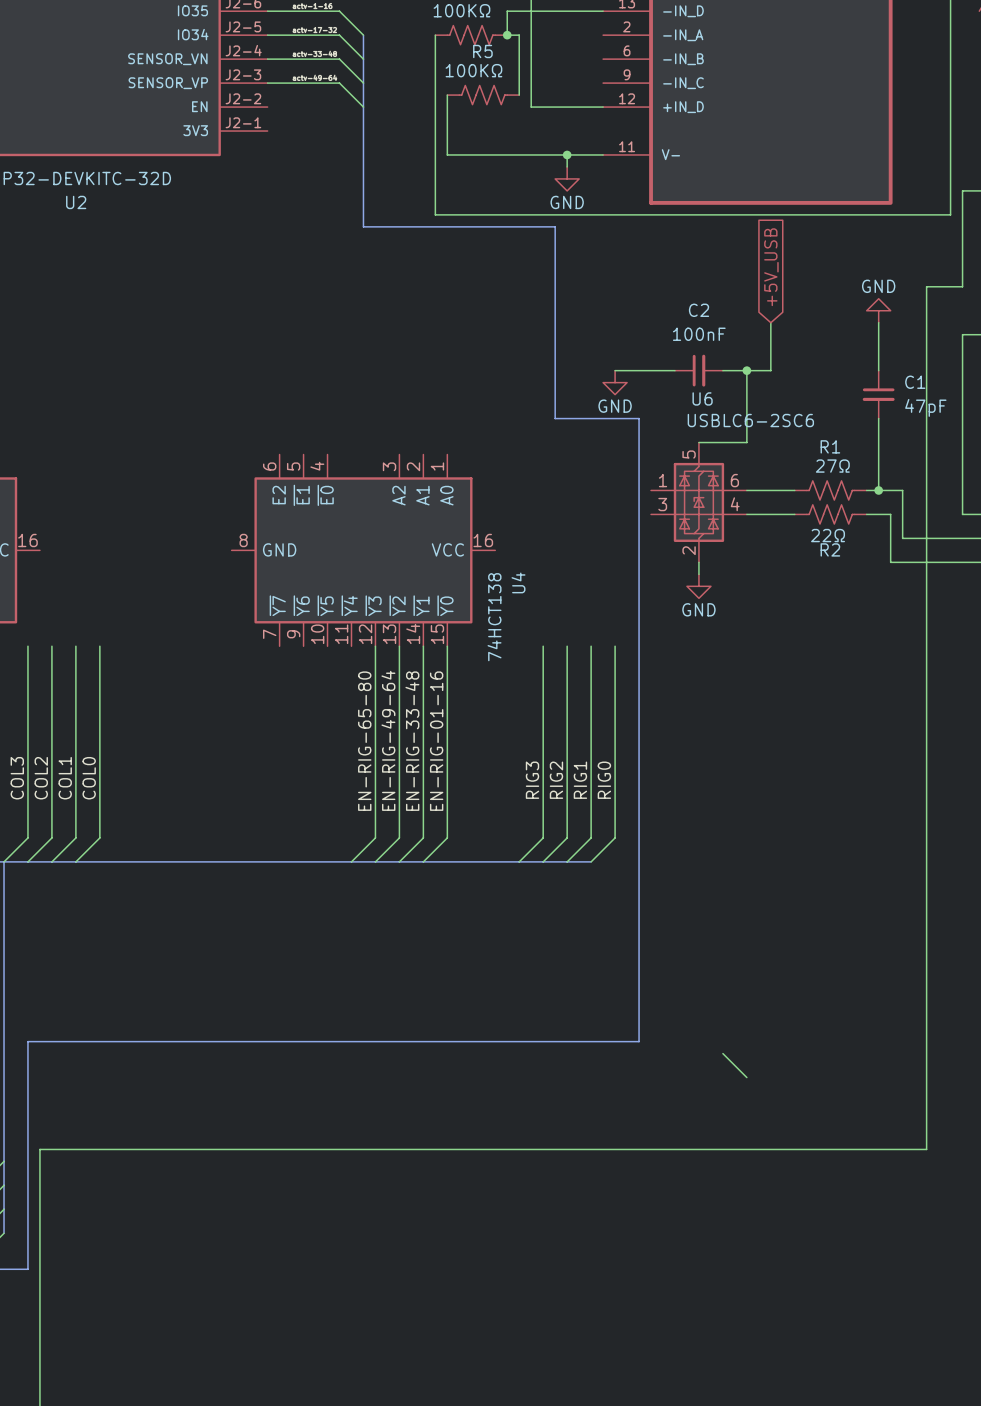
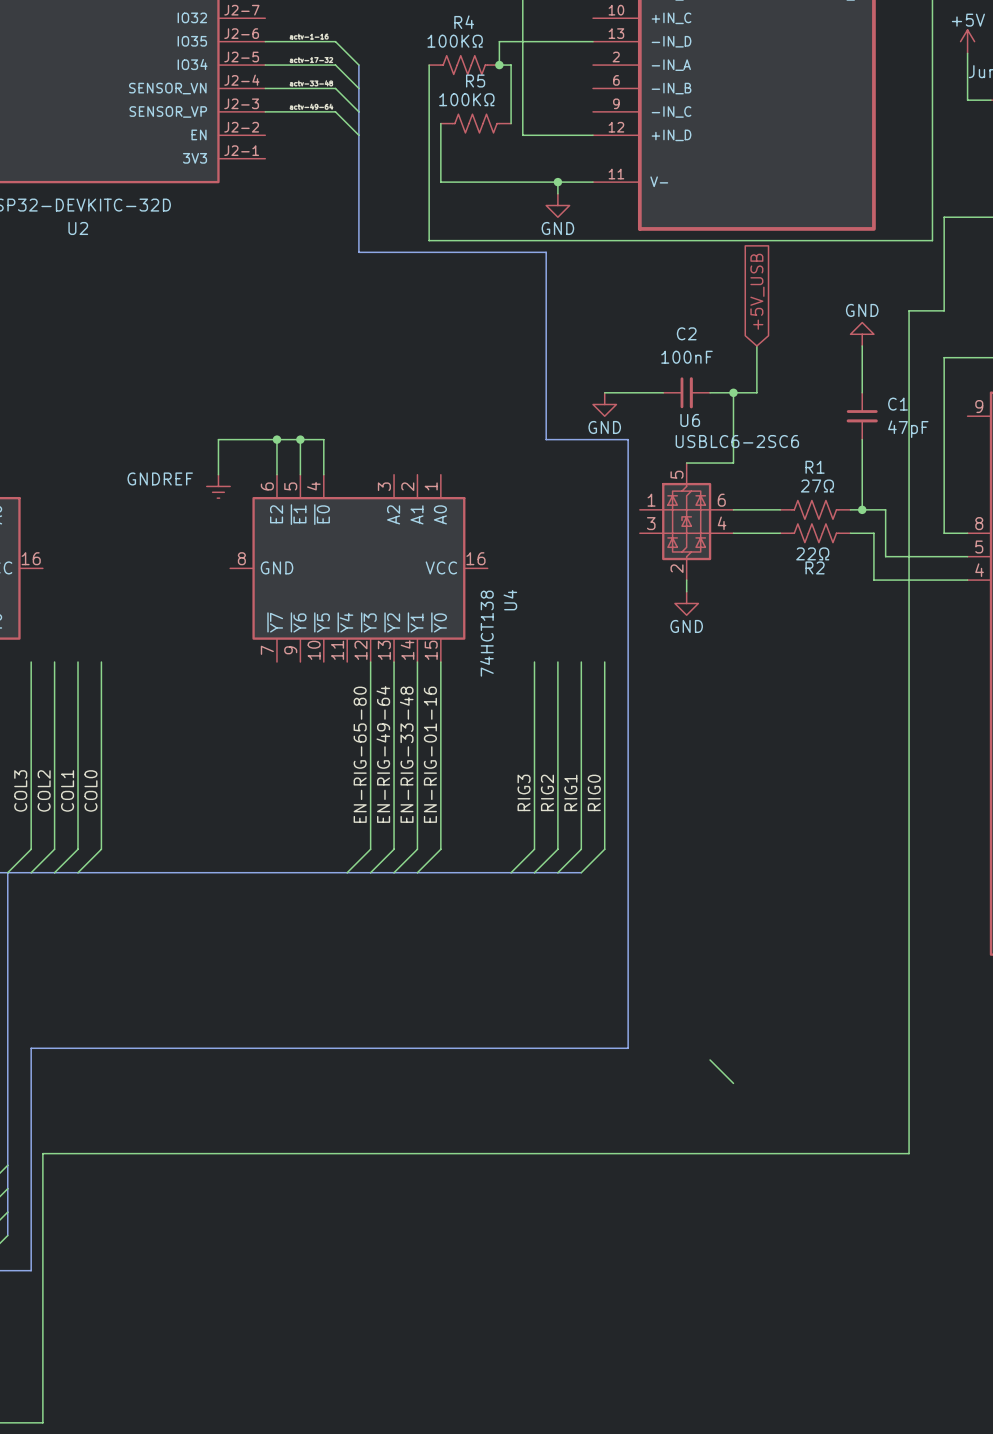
wire: none -> (276, 439) (276, 474)
junction: none -> (276, 439)
wire: none -> (300, 439) (300, 474)
junction: none -> (300, 439)
wire: none -> (218, 474) (218, 439) (323, 439) (323, 474)
power symbol: none -> GNDREF (218, 486)

